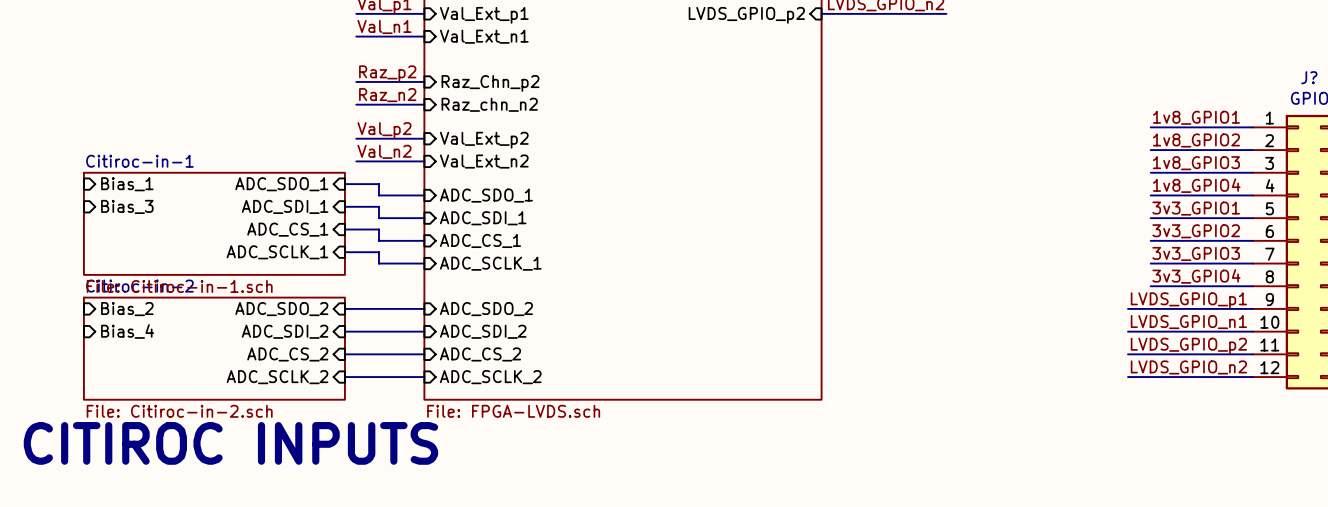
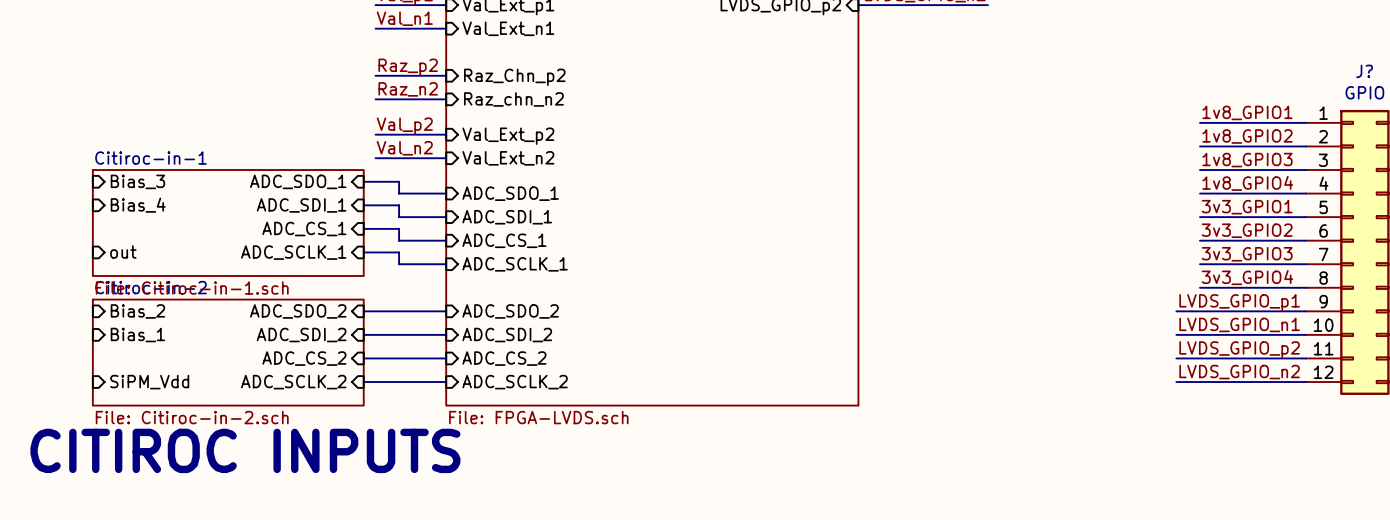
sheet pin: Bias_1 (127, 184) -> Bias_3 (137, 181)
sheet pin: Bias_3 (127, 206) -> Bias_4 (138, 205)
sheet pin: none -> out (123, 252)
sheet pin: Bias_4 (127, 331) -> Bias_1 (137, 335)
sheet pin: none -> SiPM_Vdd (149, 382)

